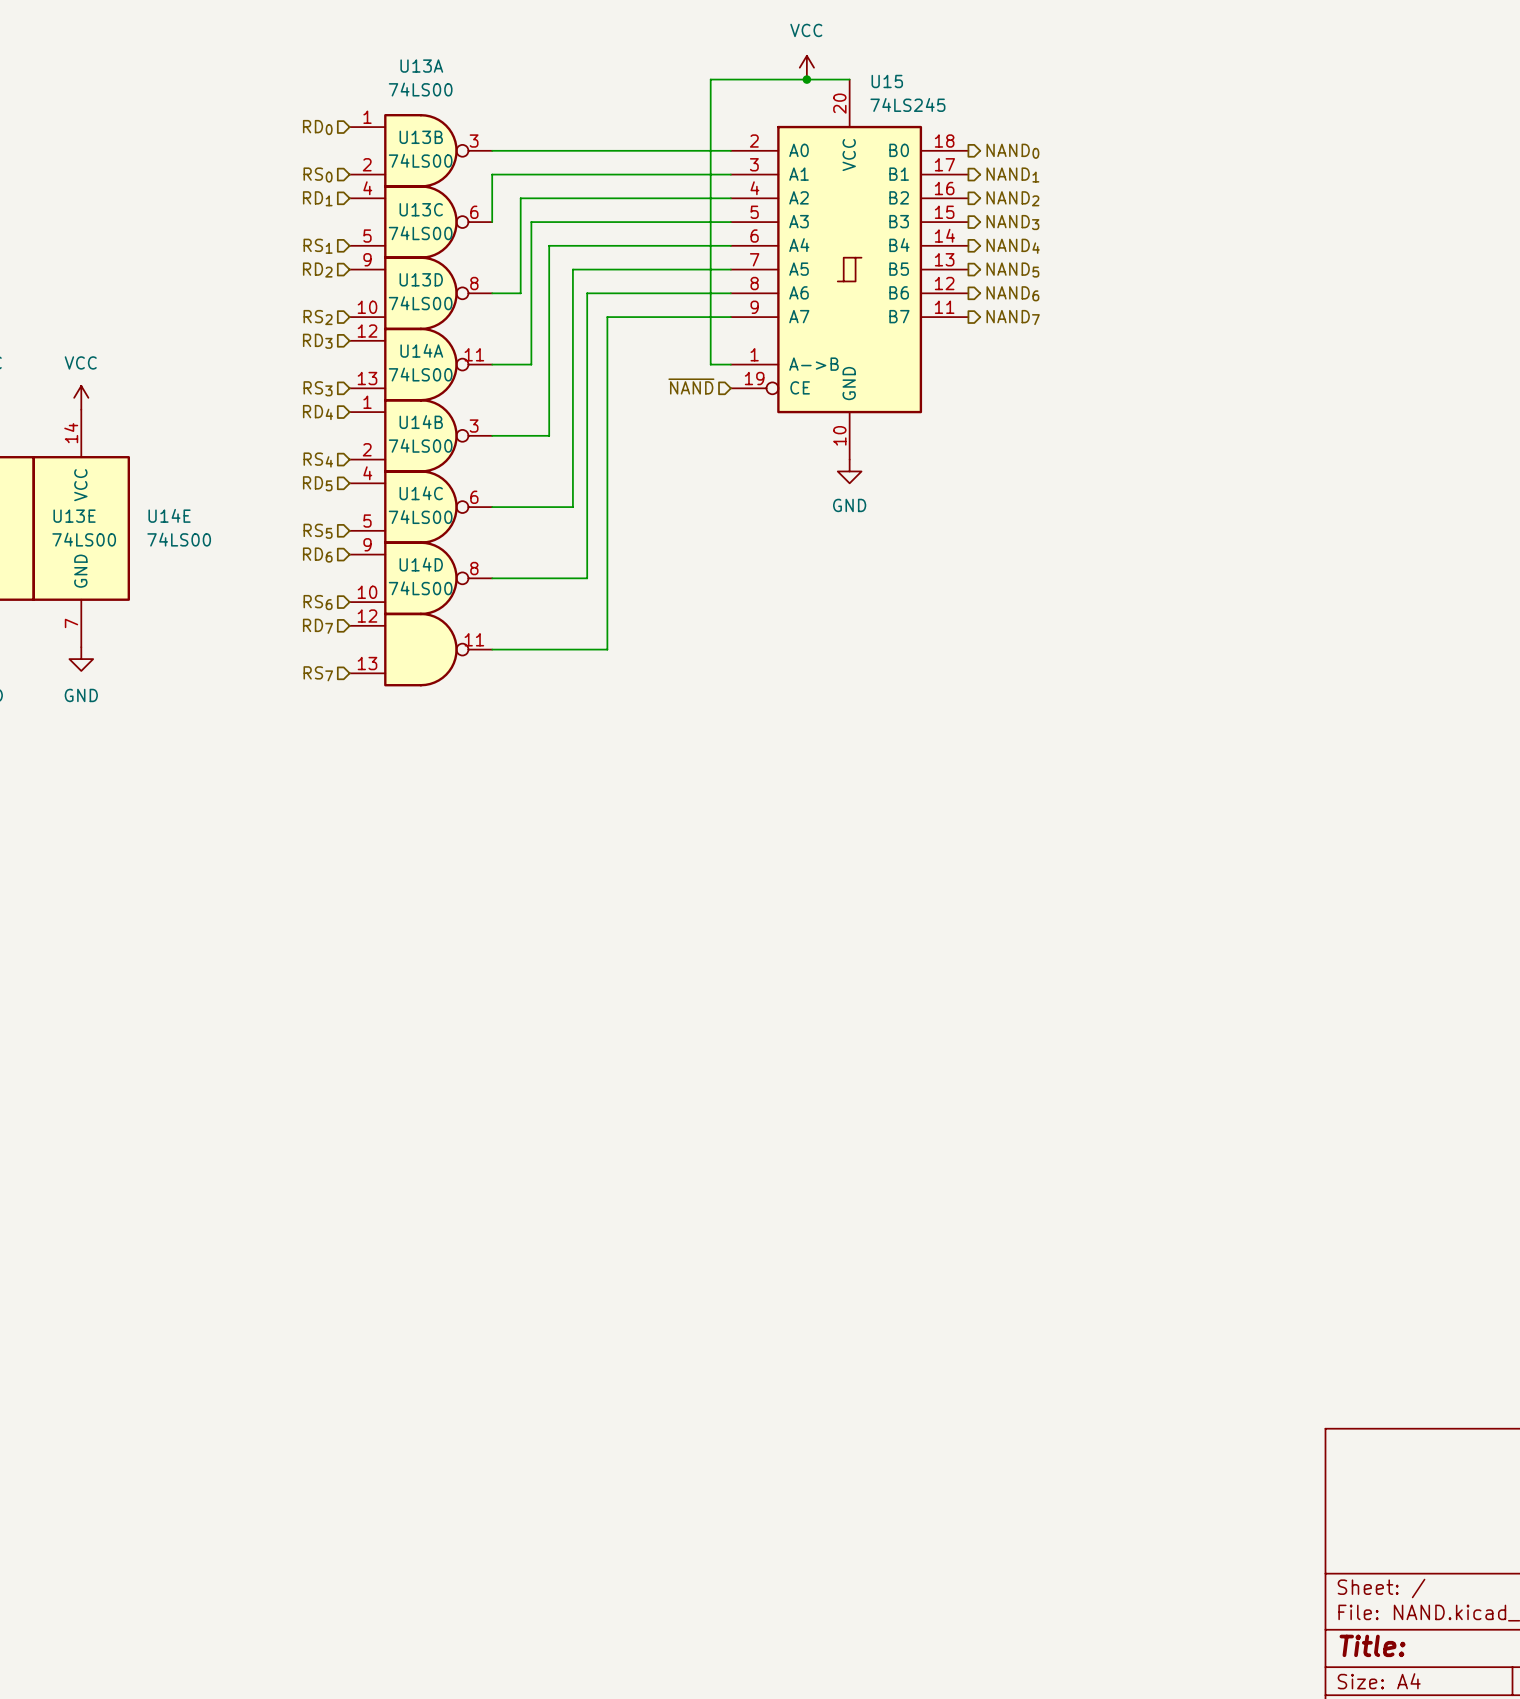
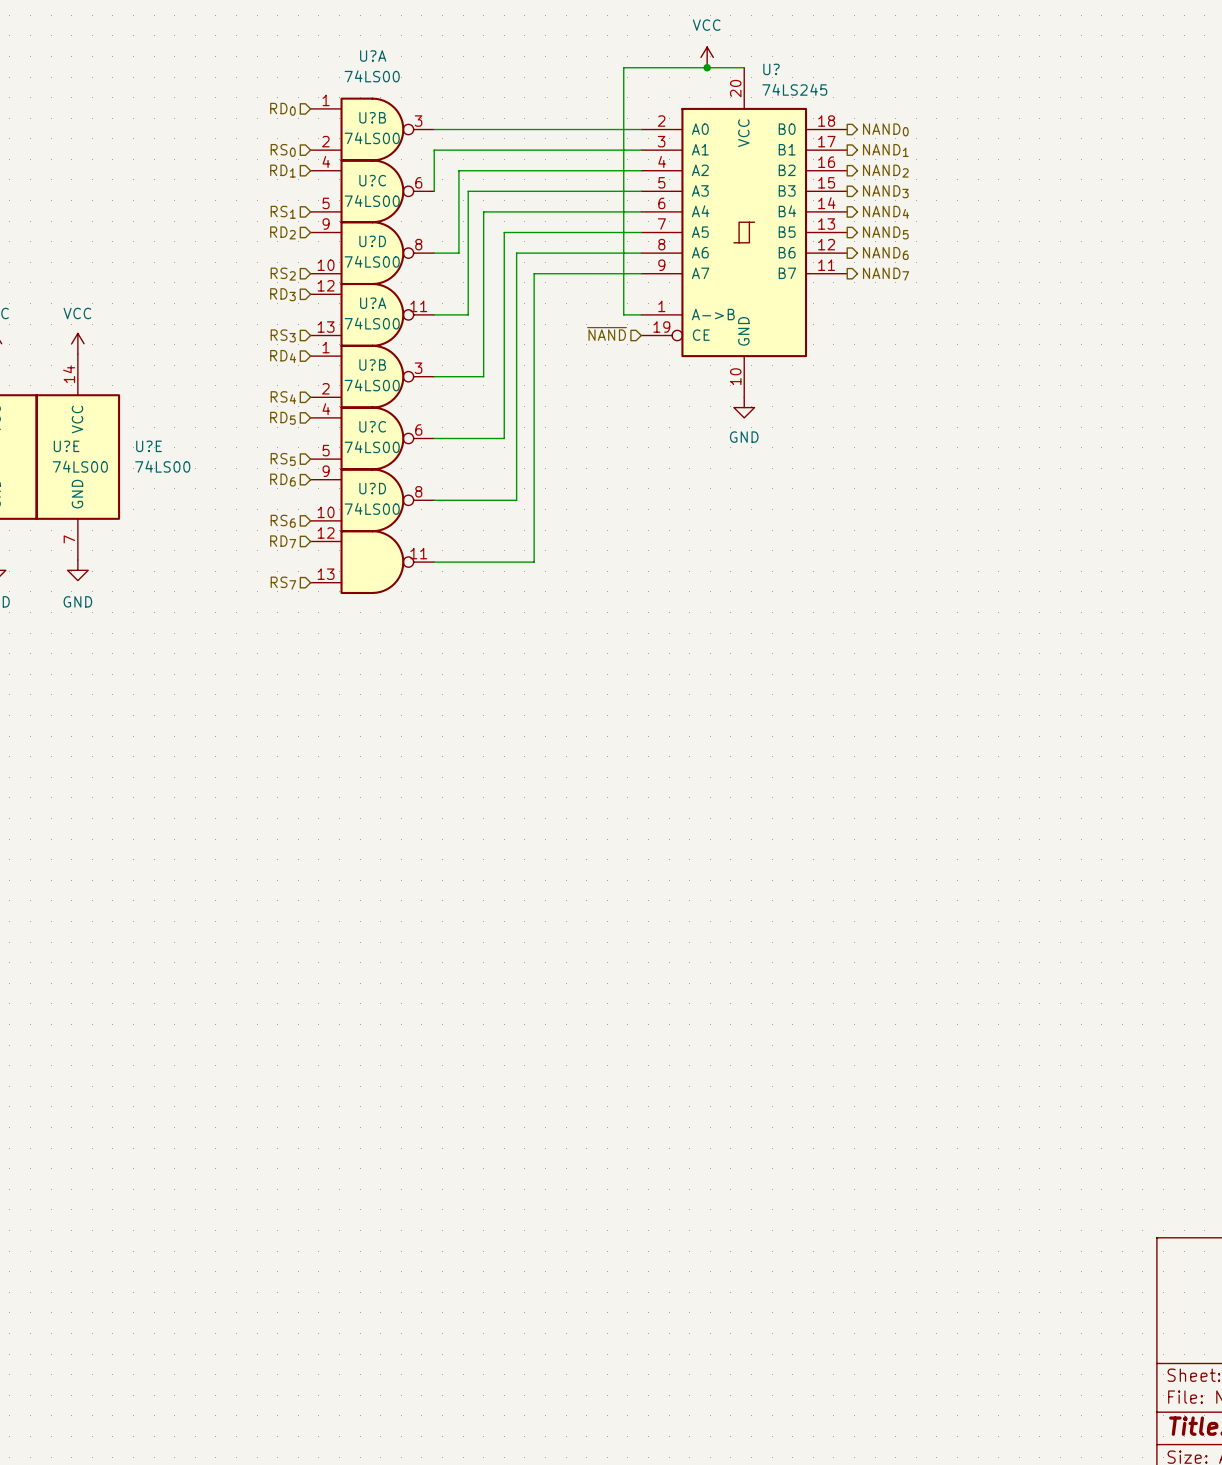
U13A name: U13A (421, 66) -> U?A (373, 56)
U15 name: U15 (887, 81) -> U? (771, 69)
U13B name: U13B (421, 137) -> U?B (372, 117)
U13C name: U13C (421, 209) -> U?C (372, 180)
U13D name: U13D (421, 279) -> U?D (372, 241)
U14A name: U14A (421, 350) -> U?A (373, 303)
U14B name: U14B (421, 422) -> U?B (372, 364)
U14C name: U14C (421, 493) -> U?C (372, 426)
U14E name: U14E (169, 515) -> U?E (149, 446)
U13E name: U13E (74, 516) -> U?E (66, 446)
U14D name: U14D (421, 564) -> U?D (372, 488)

